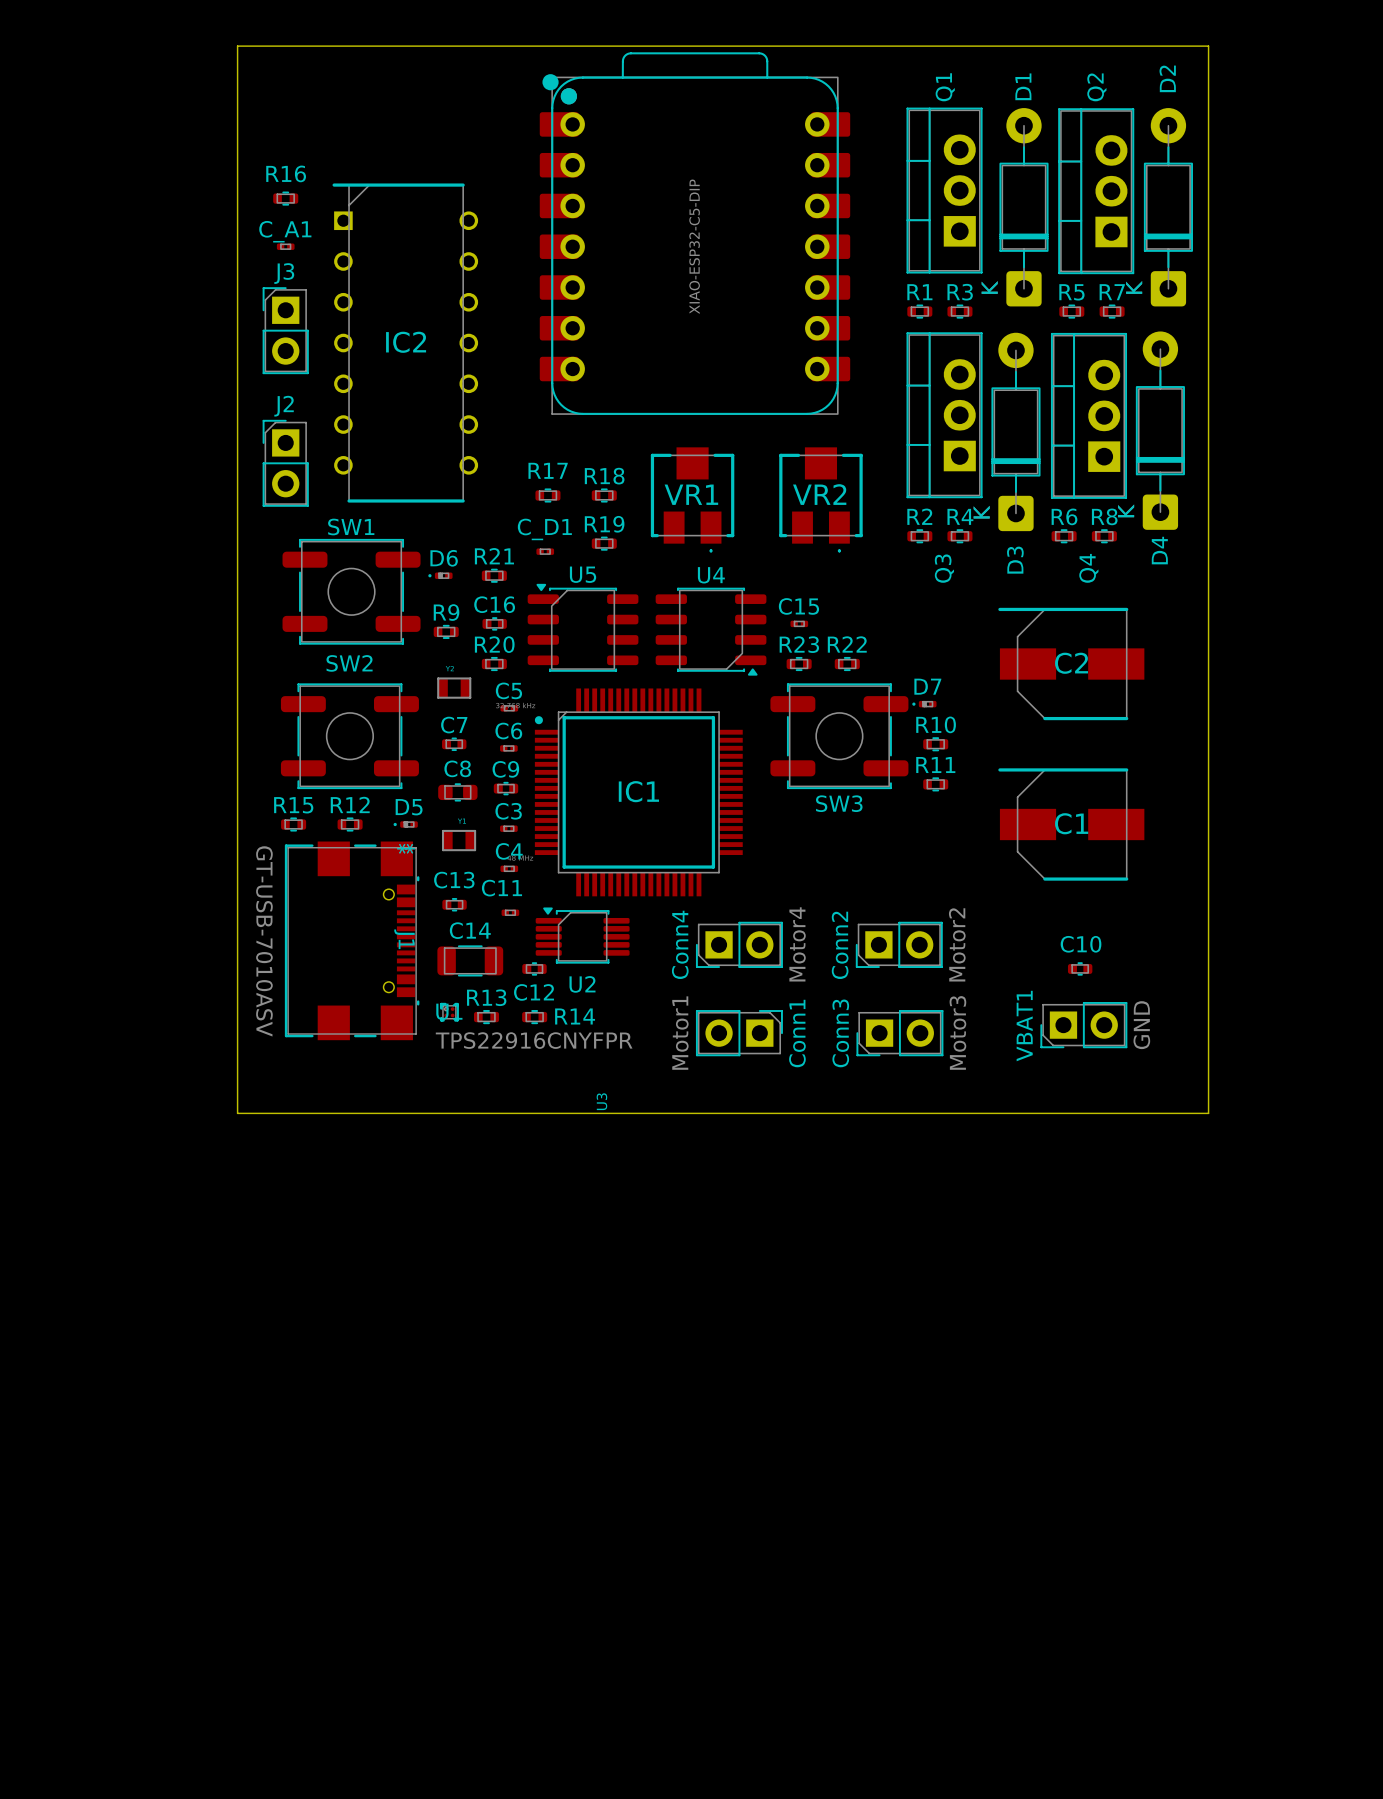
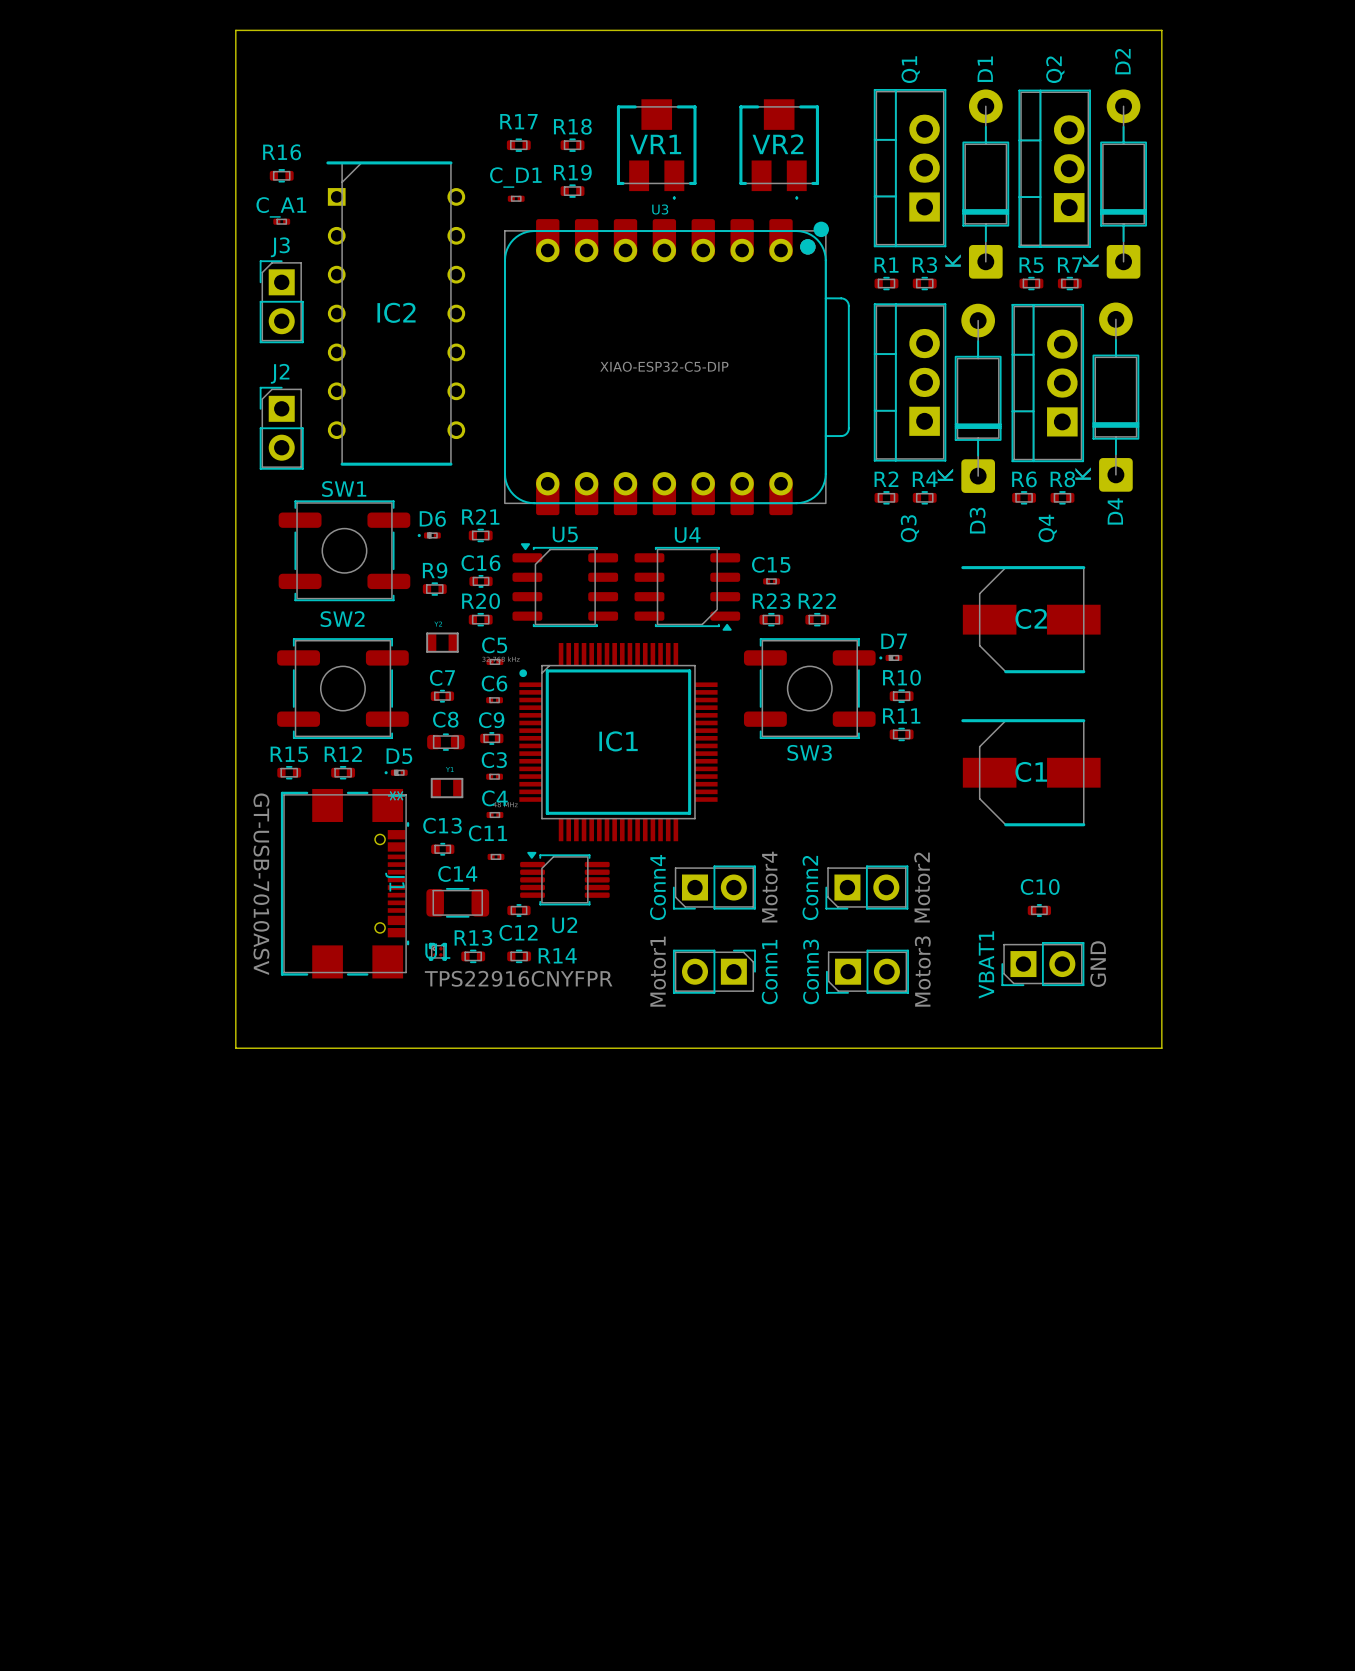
U3 rotation: 0° (694, 233) -> 90° clockwise (676, 367)
R17 position: (547, 495) -> (518, 145)
R18 position: (604, 495) -> (572, 145)
VR1 position: (692, 499) -> (656, 149)
VR2 position: (820, 499) -> (779, 149)
R19 position: (604, 543) -> (572, 191)
C_D1 position: (545, 551) -> (516, 198)
U3 name position: U3 (601, 1101) -> U3 (660, 209)

